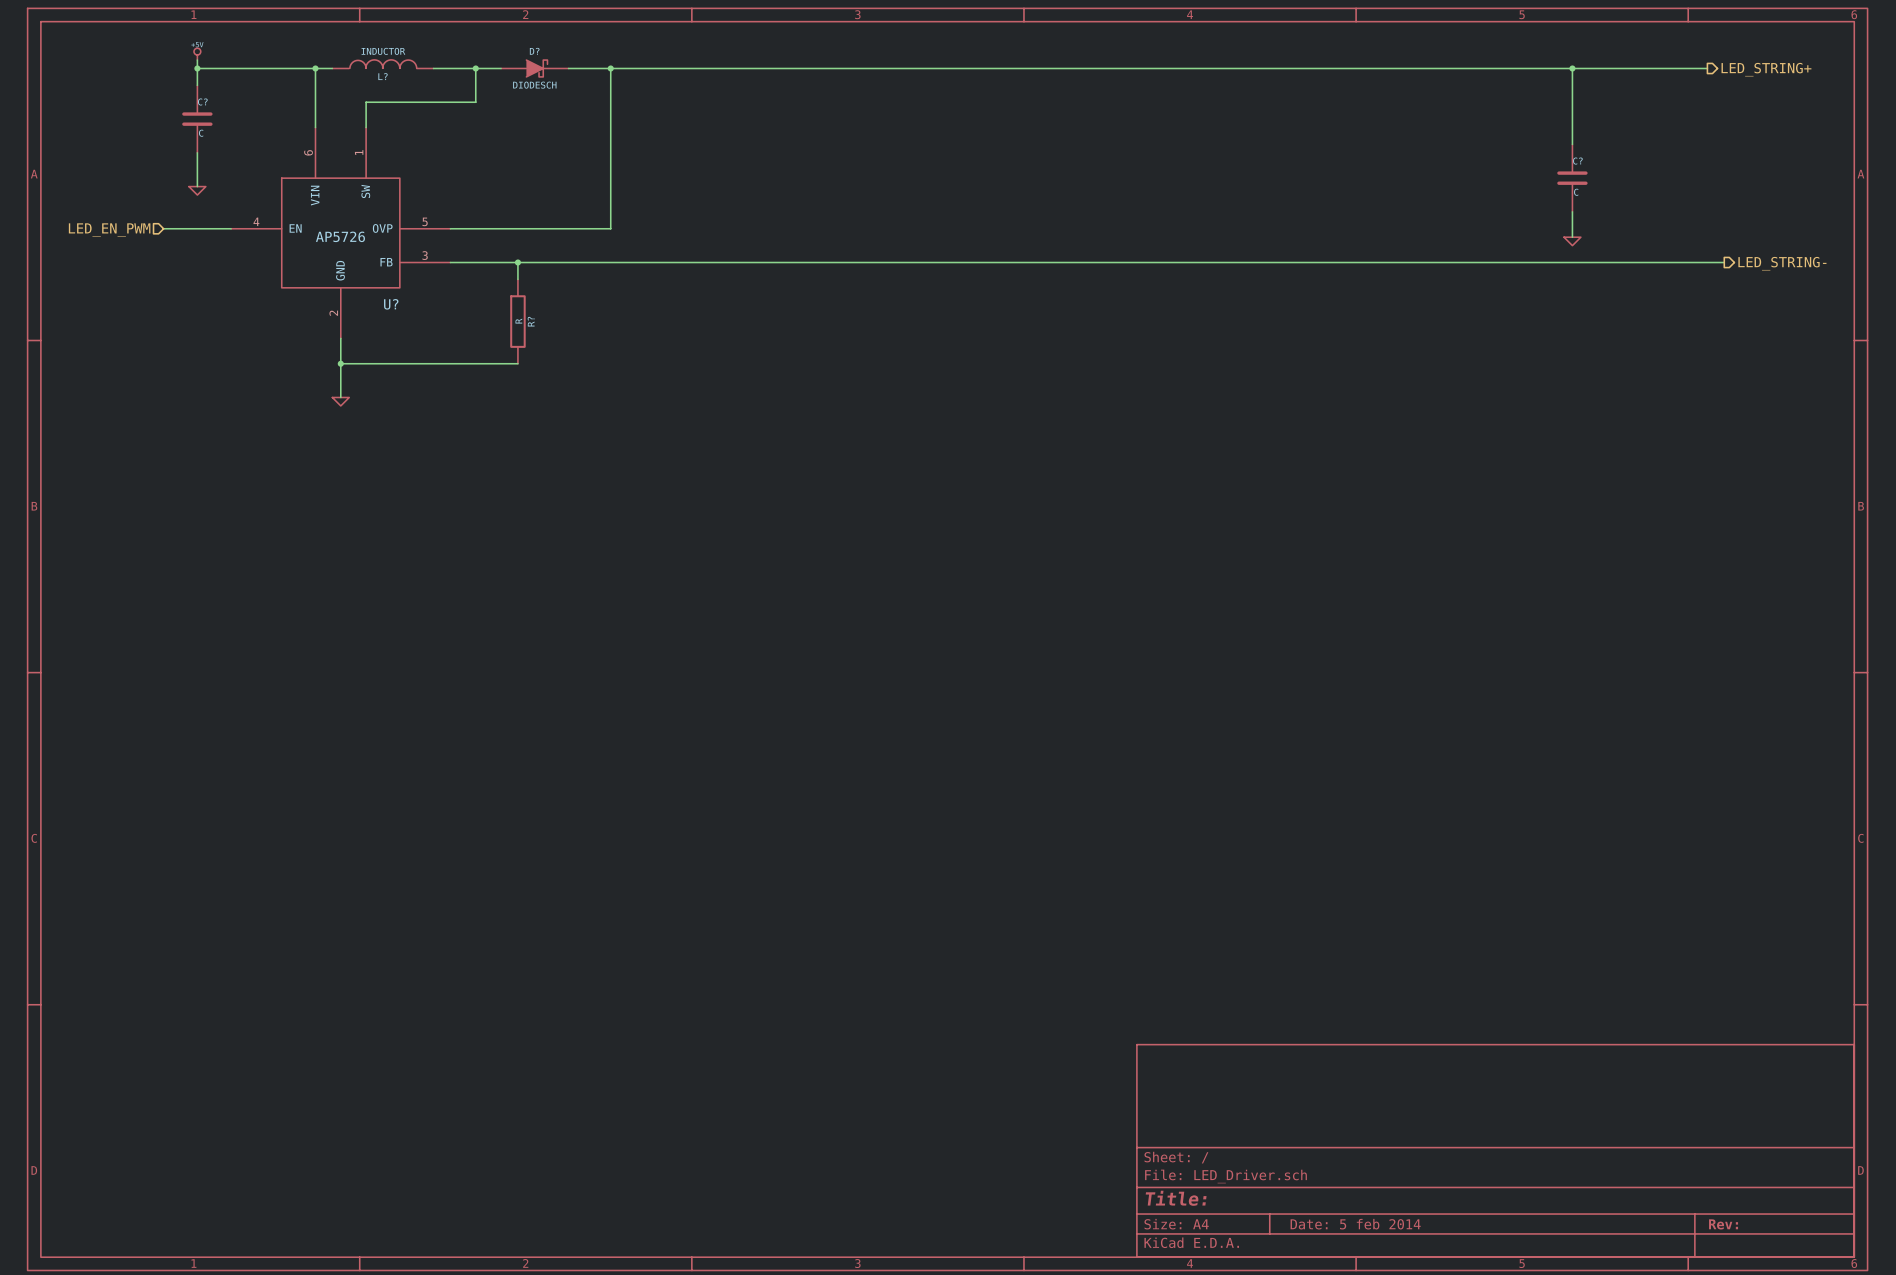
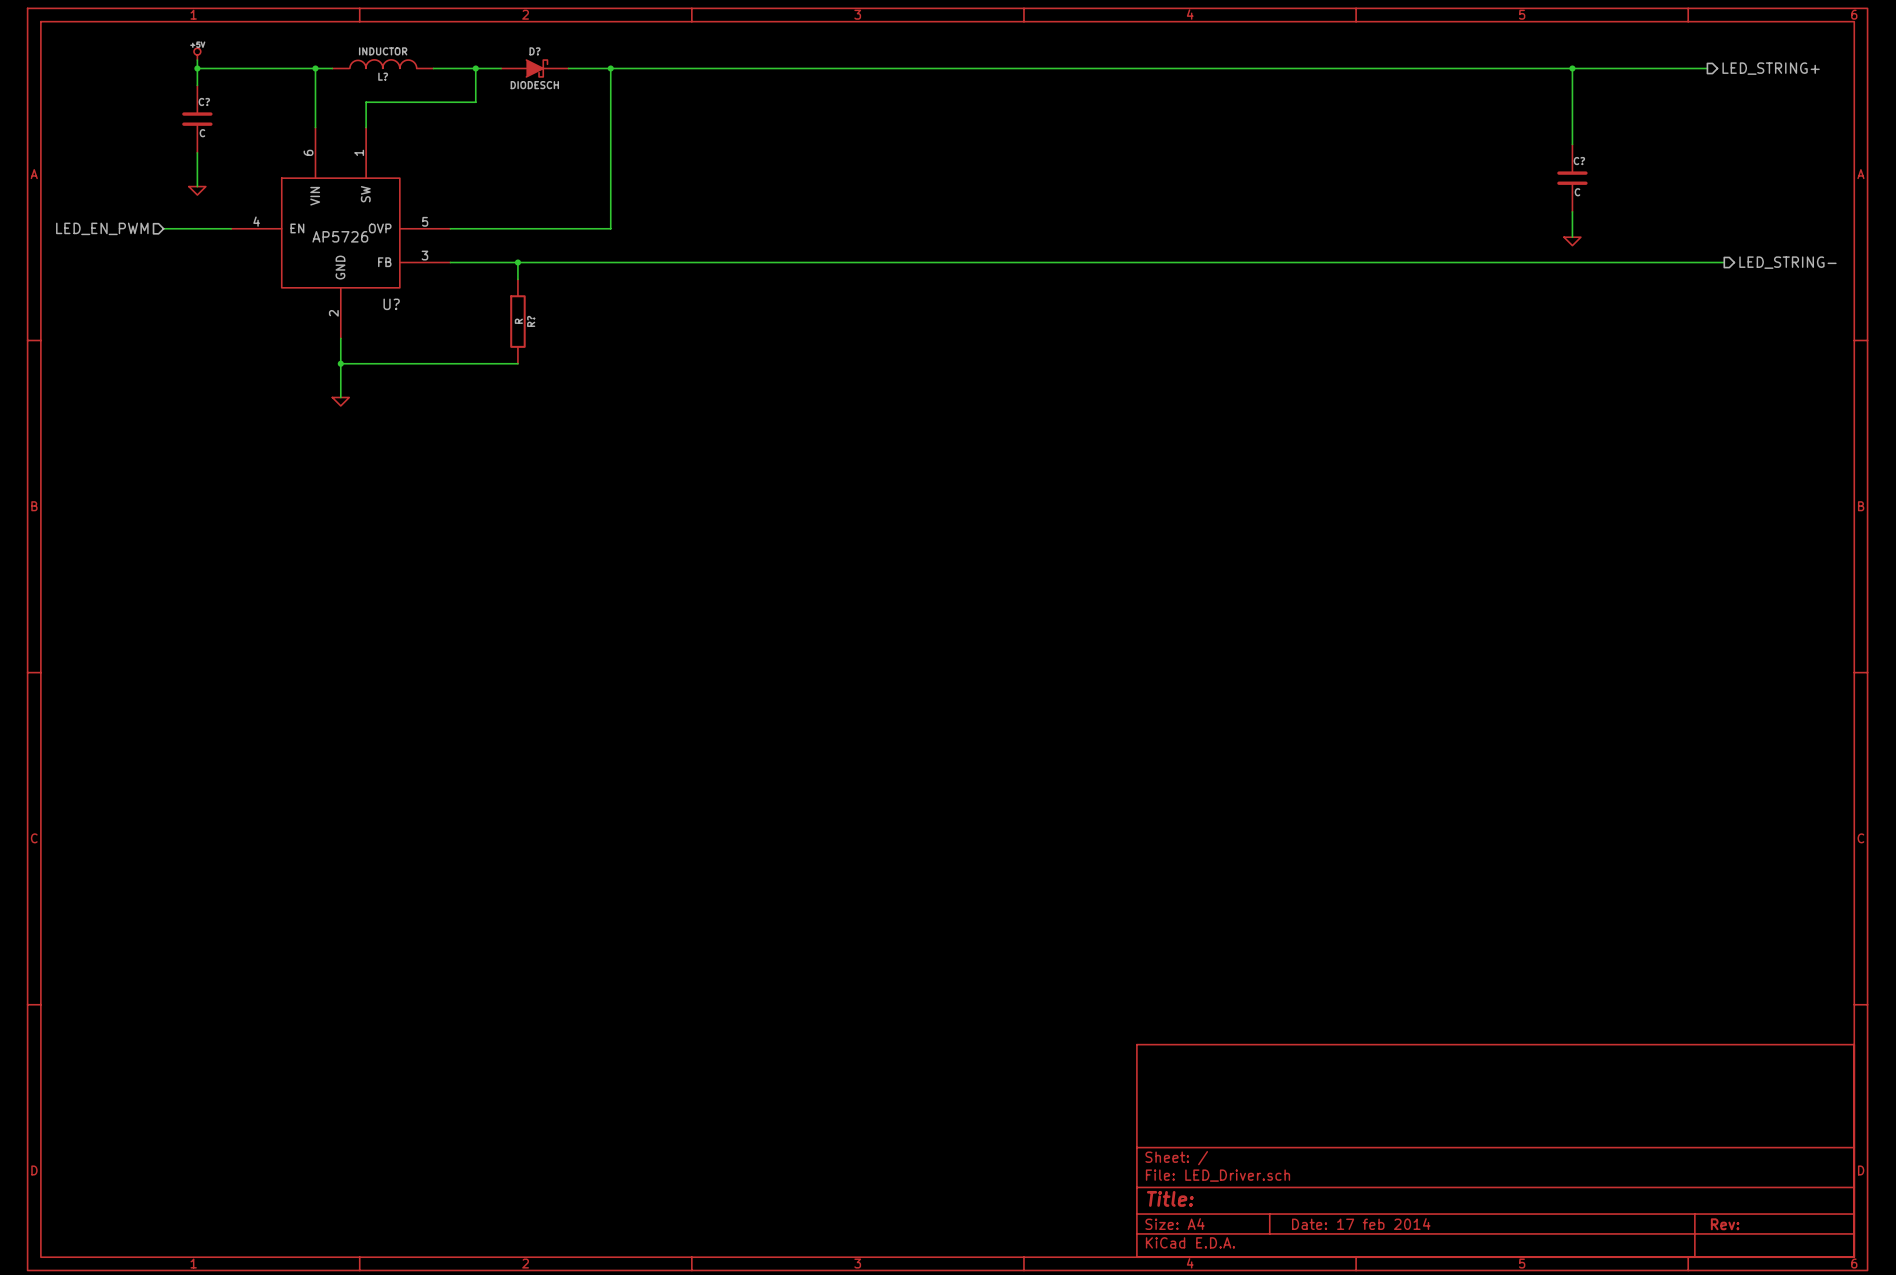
title block: Date: 5 feb 2014 (1355, 1224) -> Date: 17 feb 2014 (1361, 1224)

